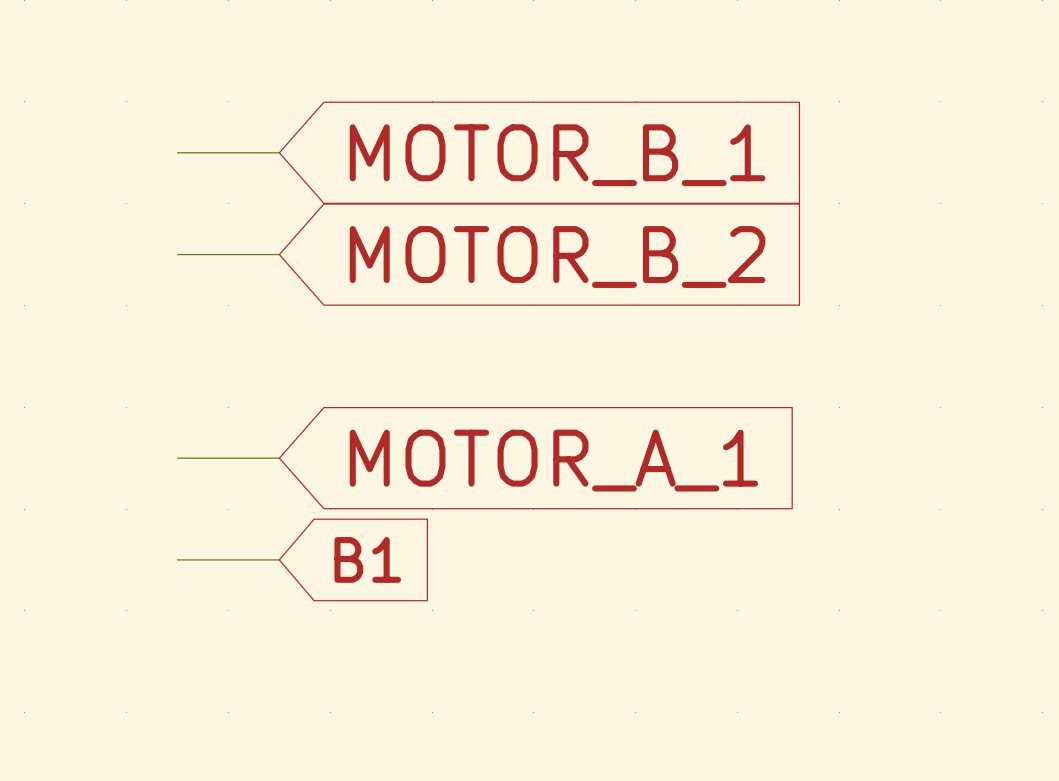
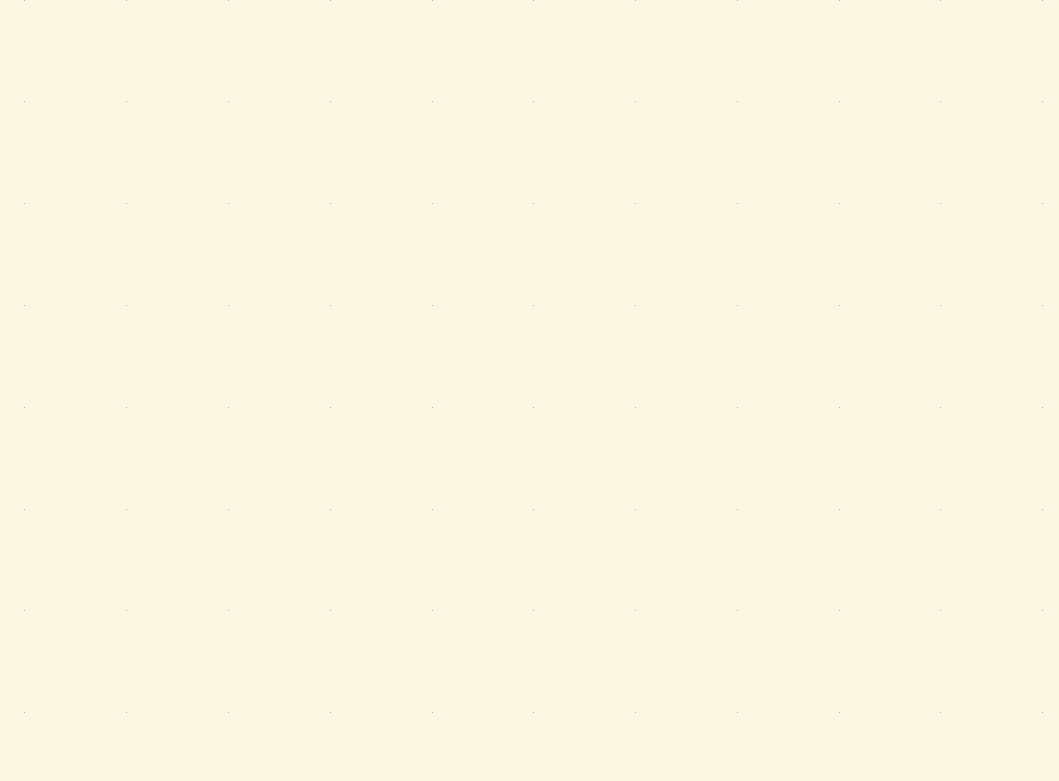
wire: (177, 152) (279, 152) -> none
global label: MOTOR_B_1 (557, 155) -> none
wire: (177, 254) (279, 254) -> none
global label: MOTOR_B_2 (557, 257) -> none
wire: (177, 458) (279, 458) -> none
global label: MOTOR_A_1 (553, 460) -> none
wire: (177, 559) (279, 559) -> none
global label: B1 (367, 559) -> none

